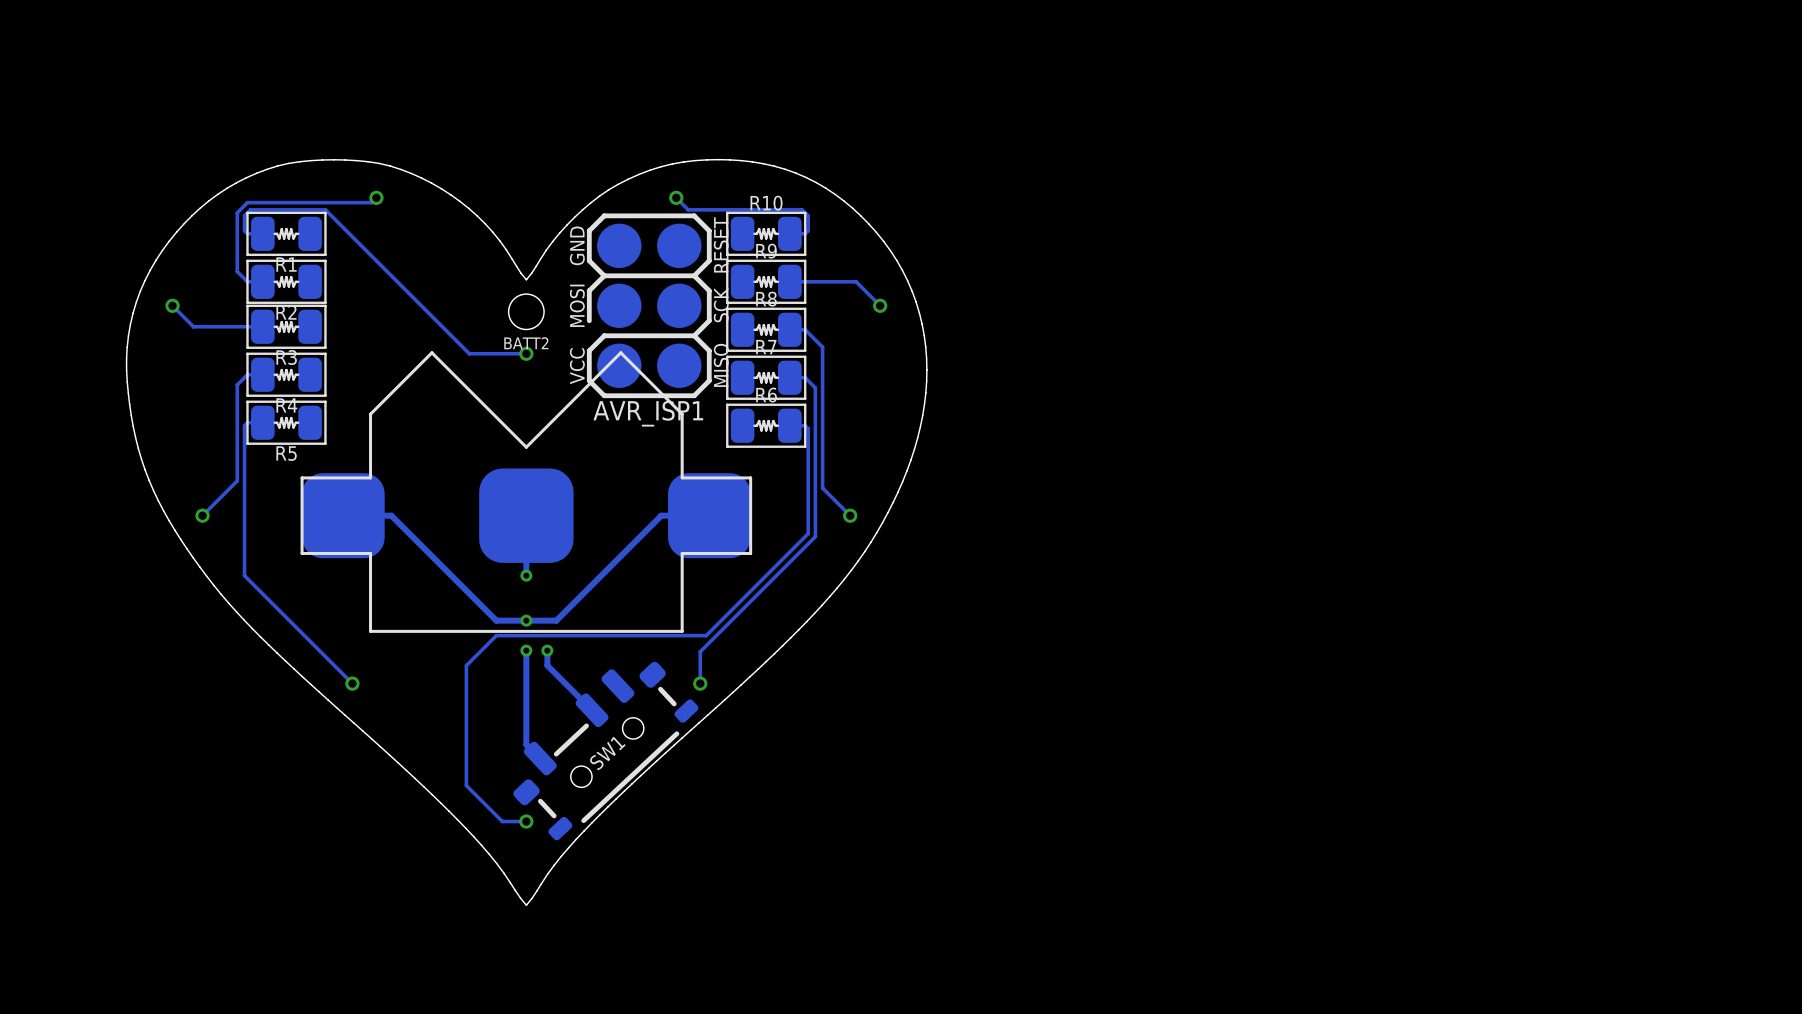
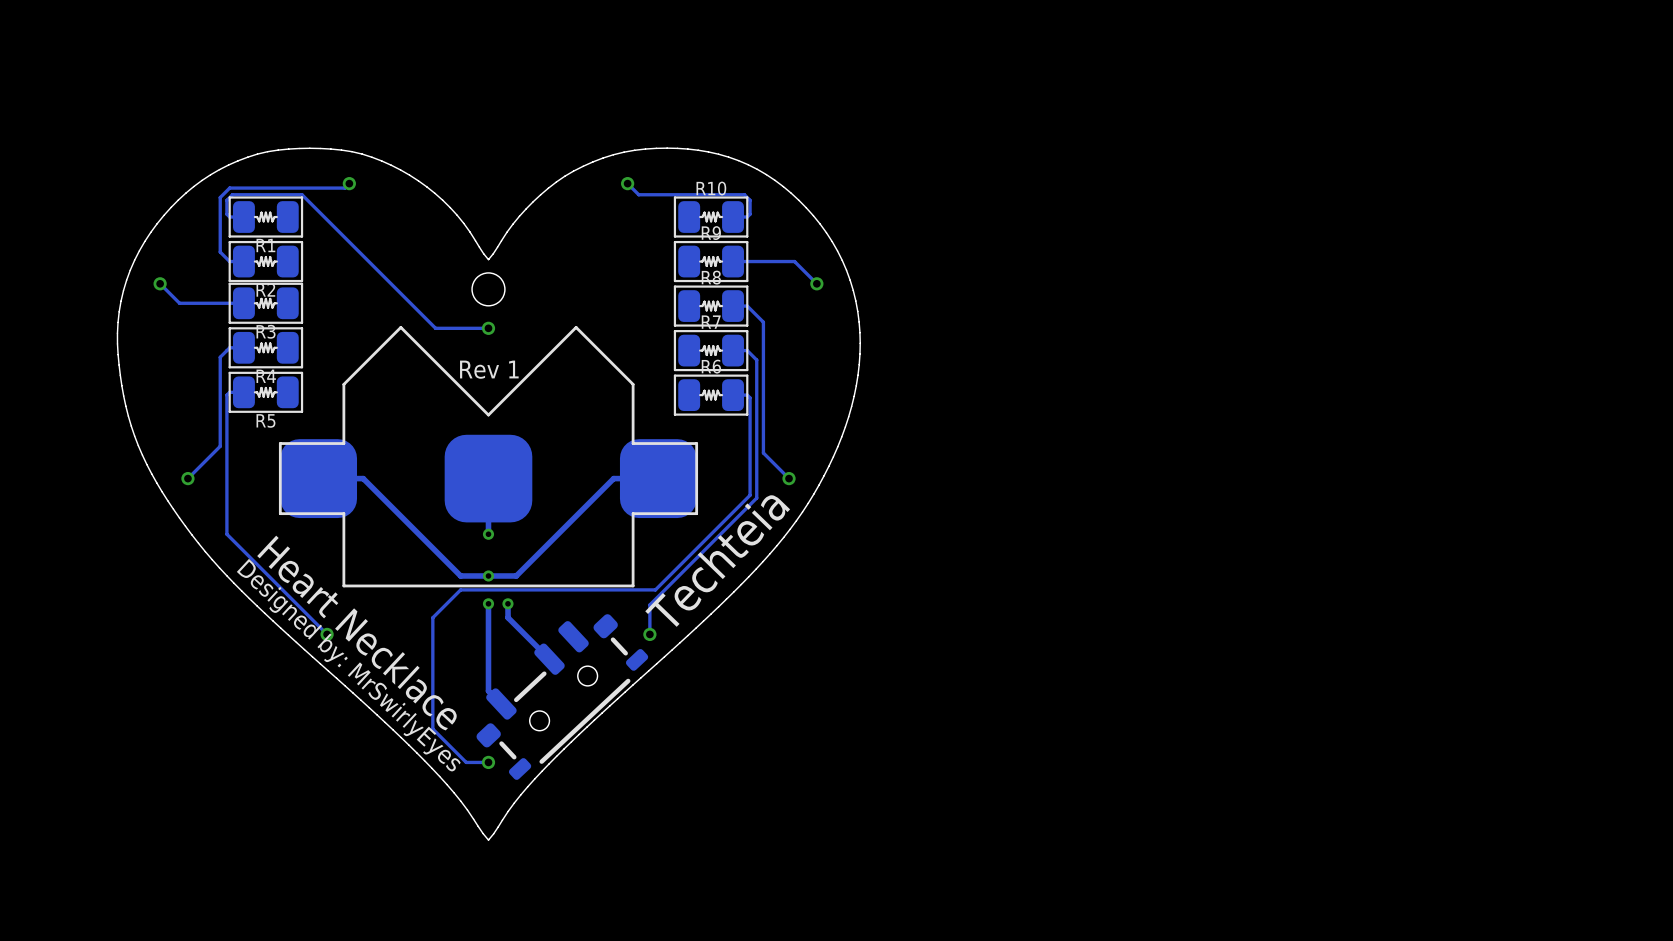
AVR_ISP1: (649, 305) -> none
BATT2 name: BATT2 (526, 343) -> none
text: none -> Rev 1 (489, 369)
text: none -> Techteia (717, 560)
text: none -> Heart Necklace (357, 633)
text: none -> Designed by: MrSwirlyEyes (348, 665)
SW1 name: SW1 (607, 753) -> none

